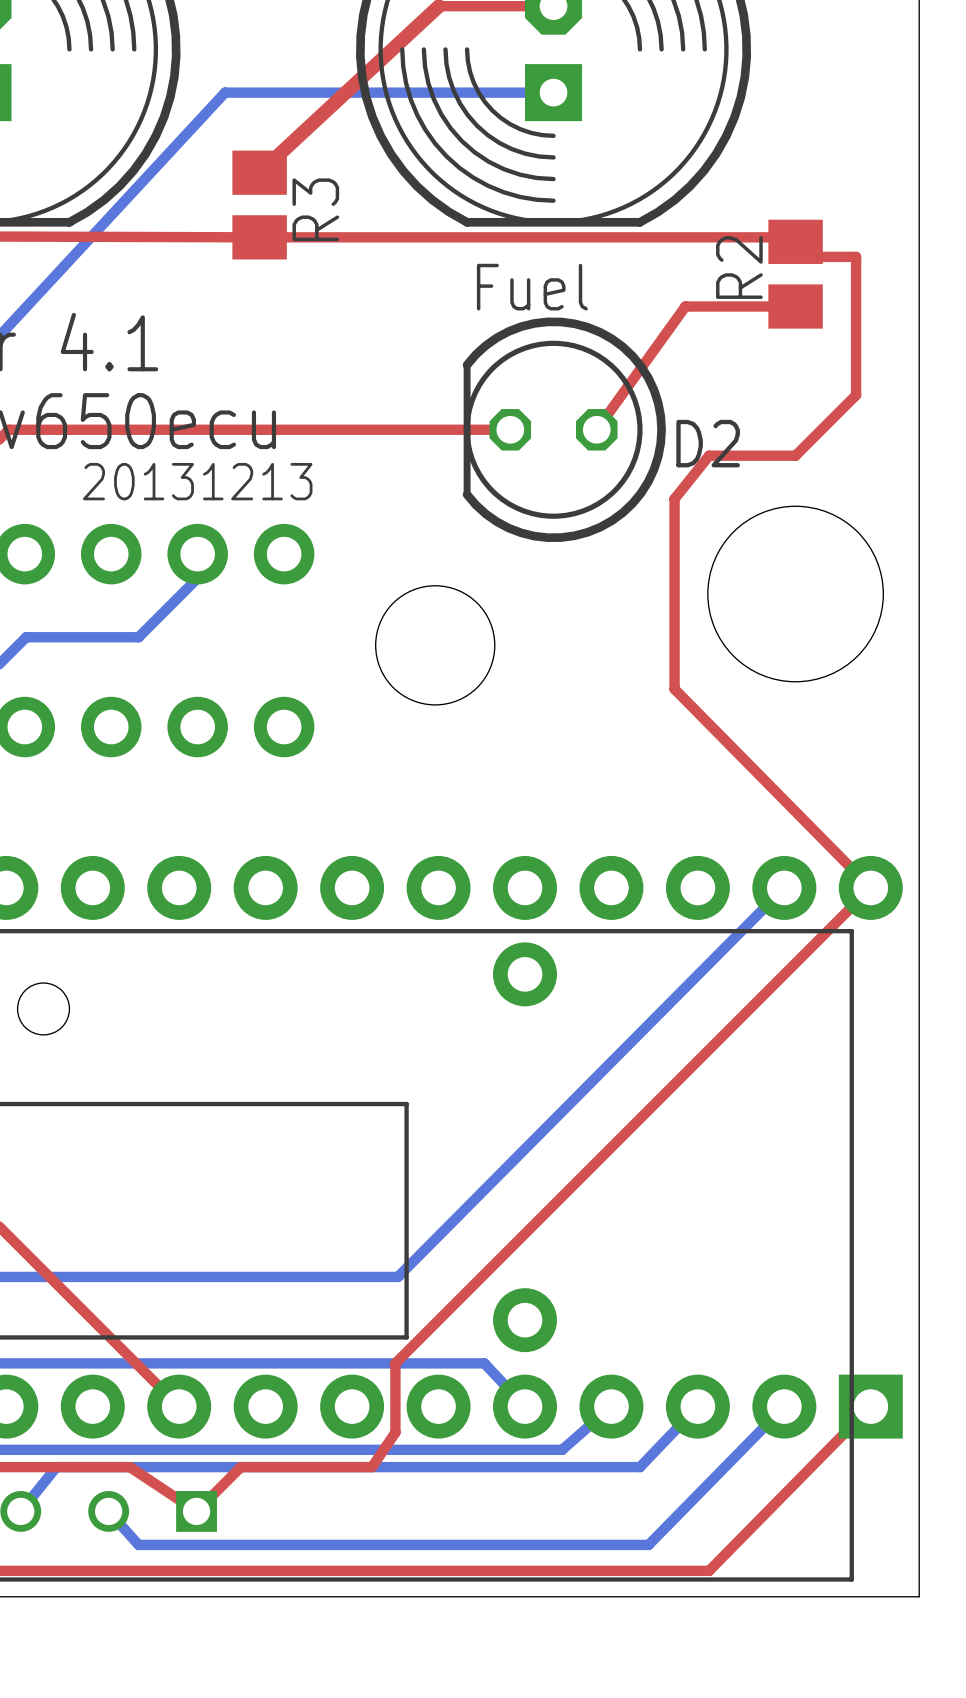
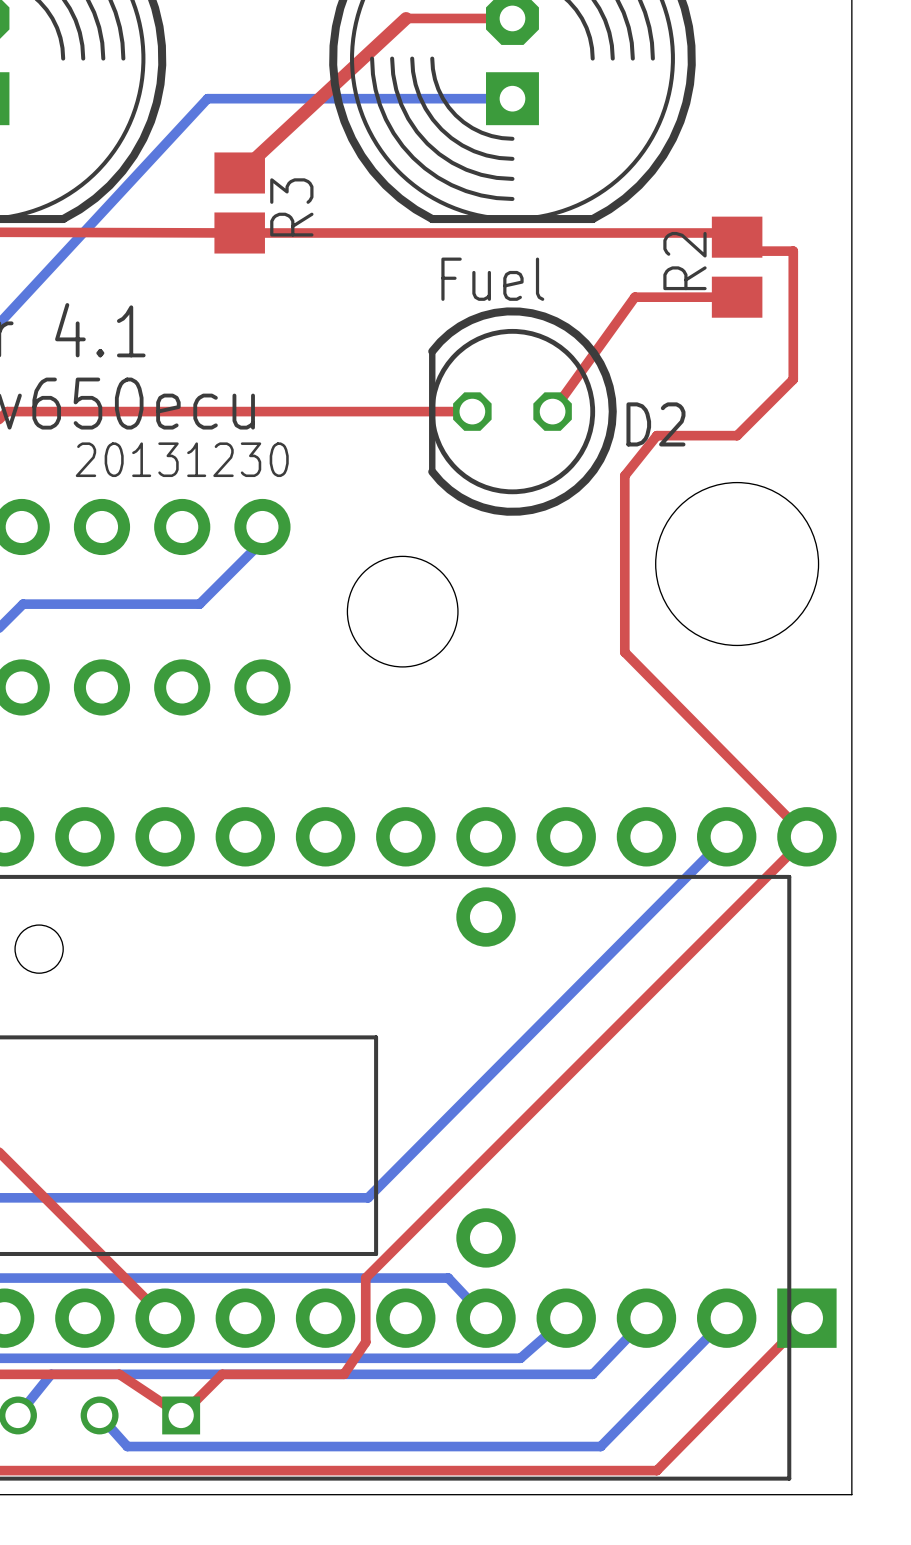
text: 20131213 (197, 481) -> 20131230 (182, 459)
bottom track: (197, 554) (197, 578) (138, 637) -> (262, 527) (262, 541) (199, 604) (127, 604)

